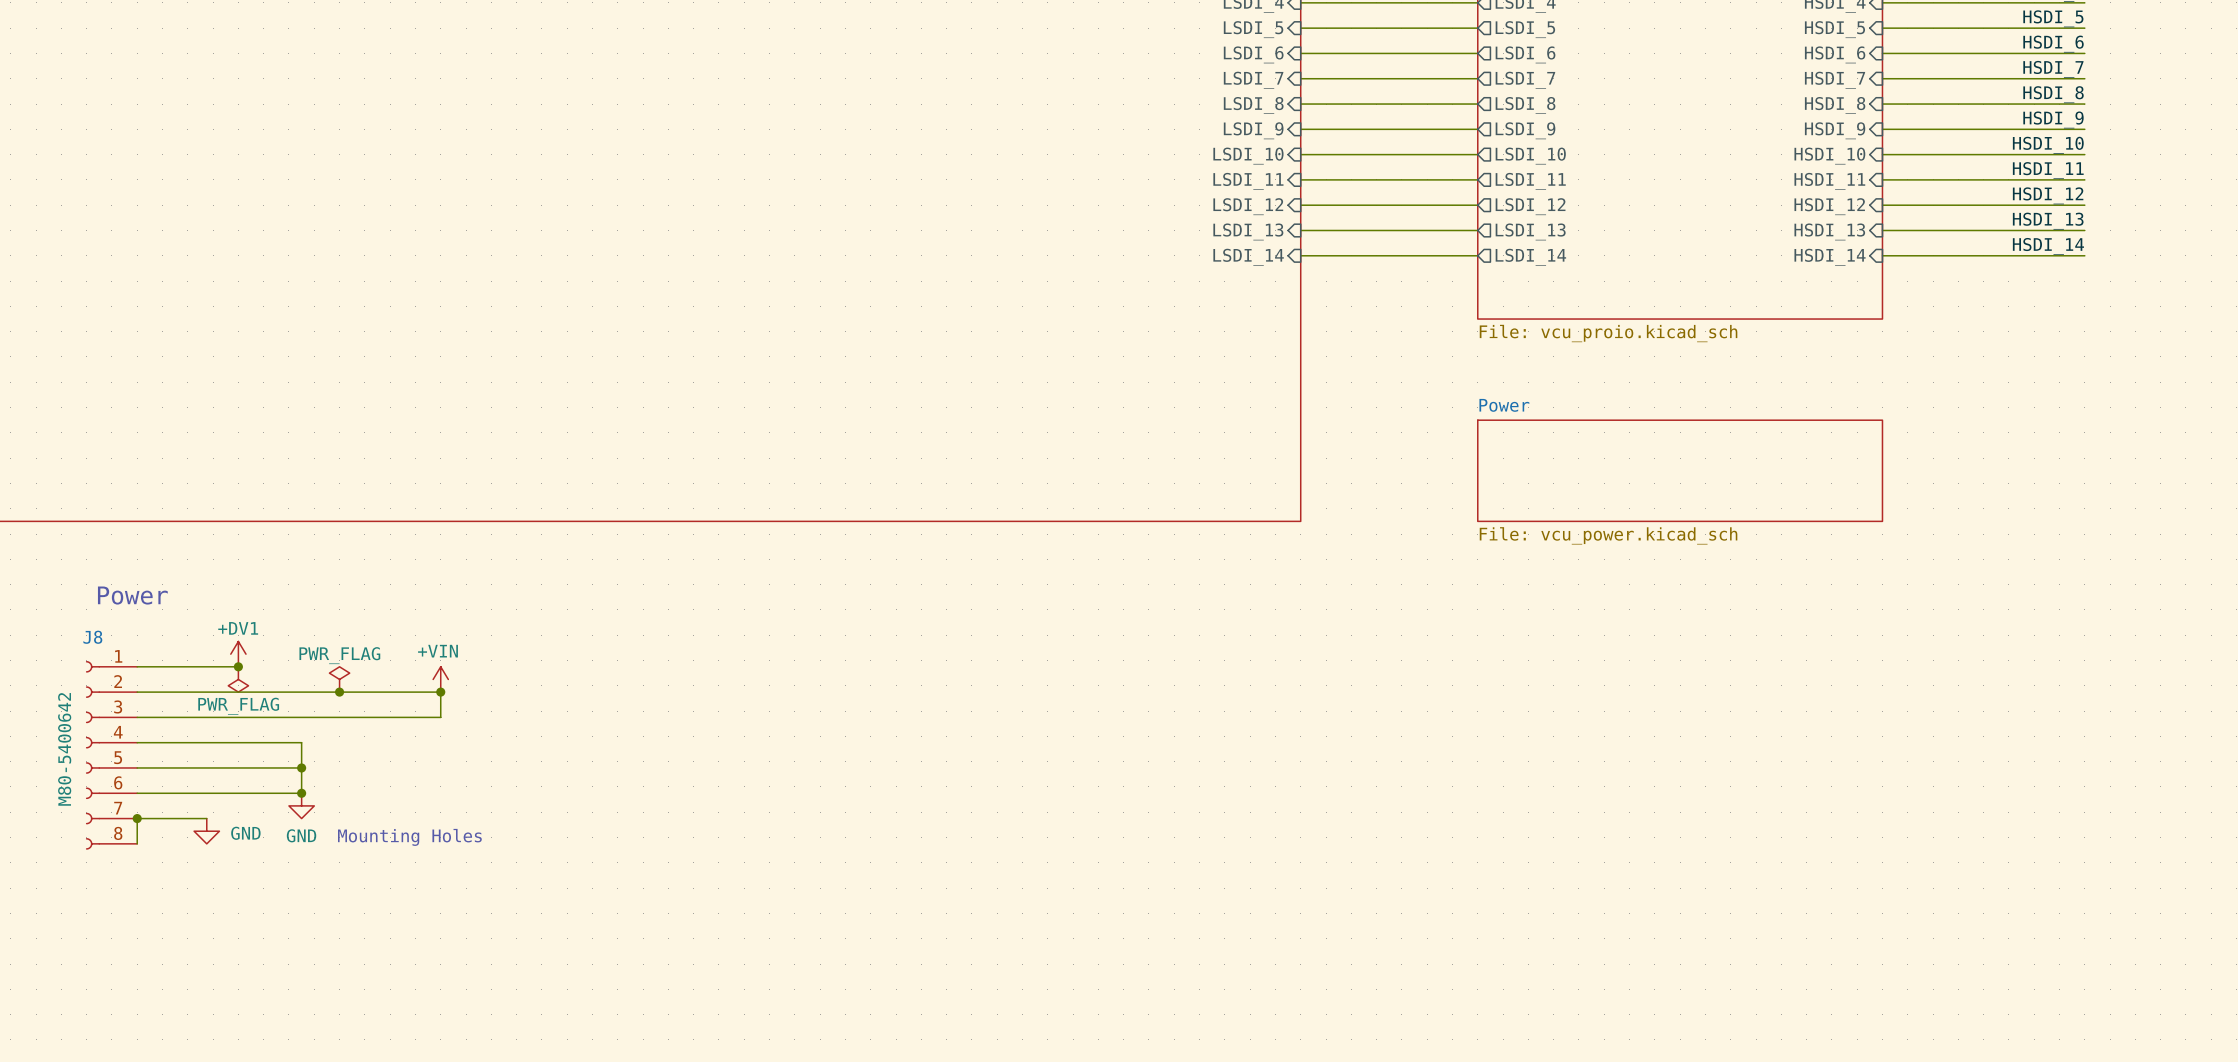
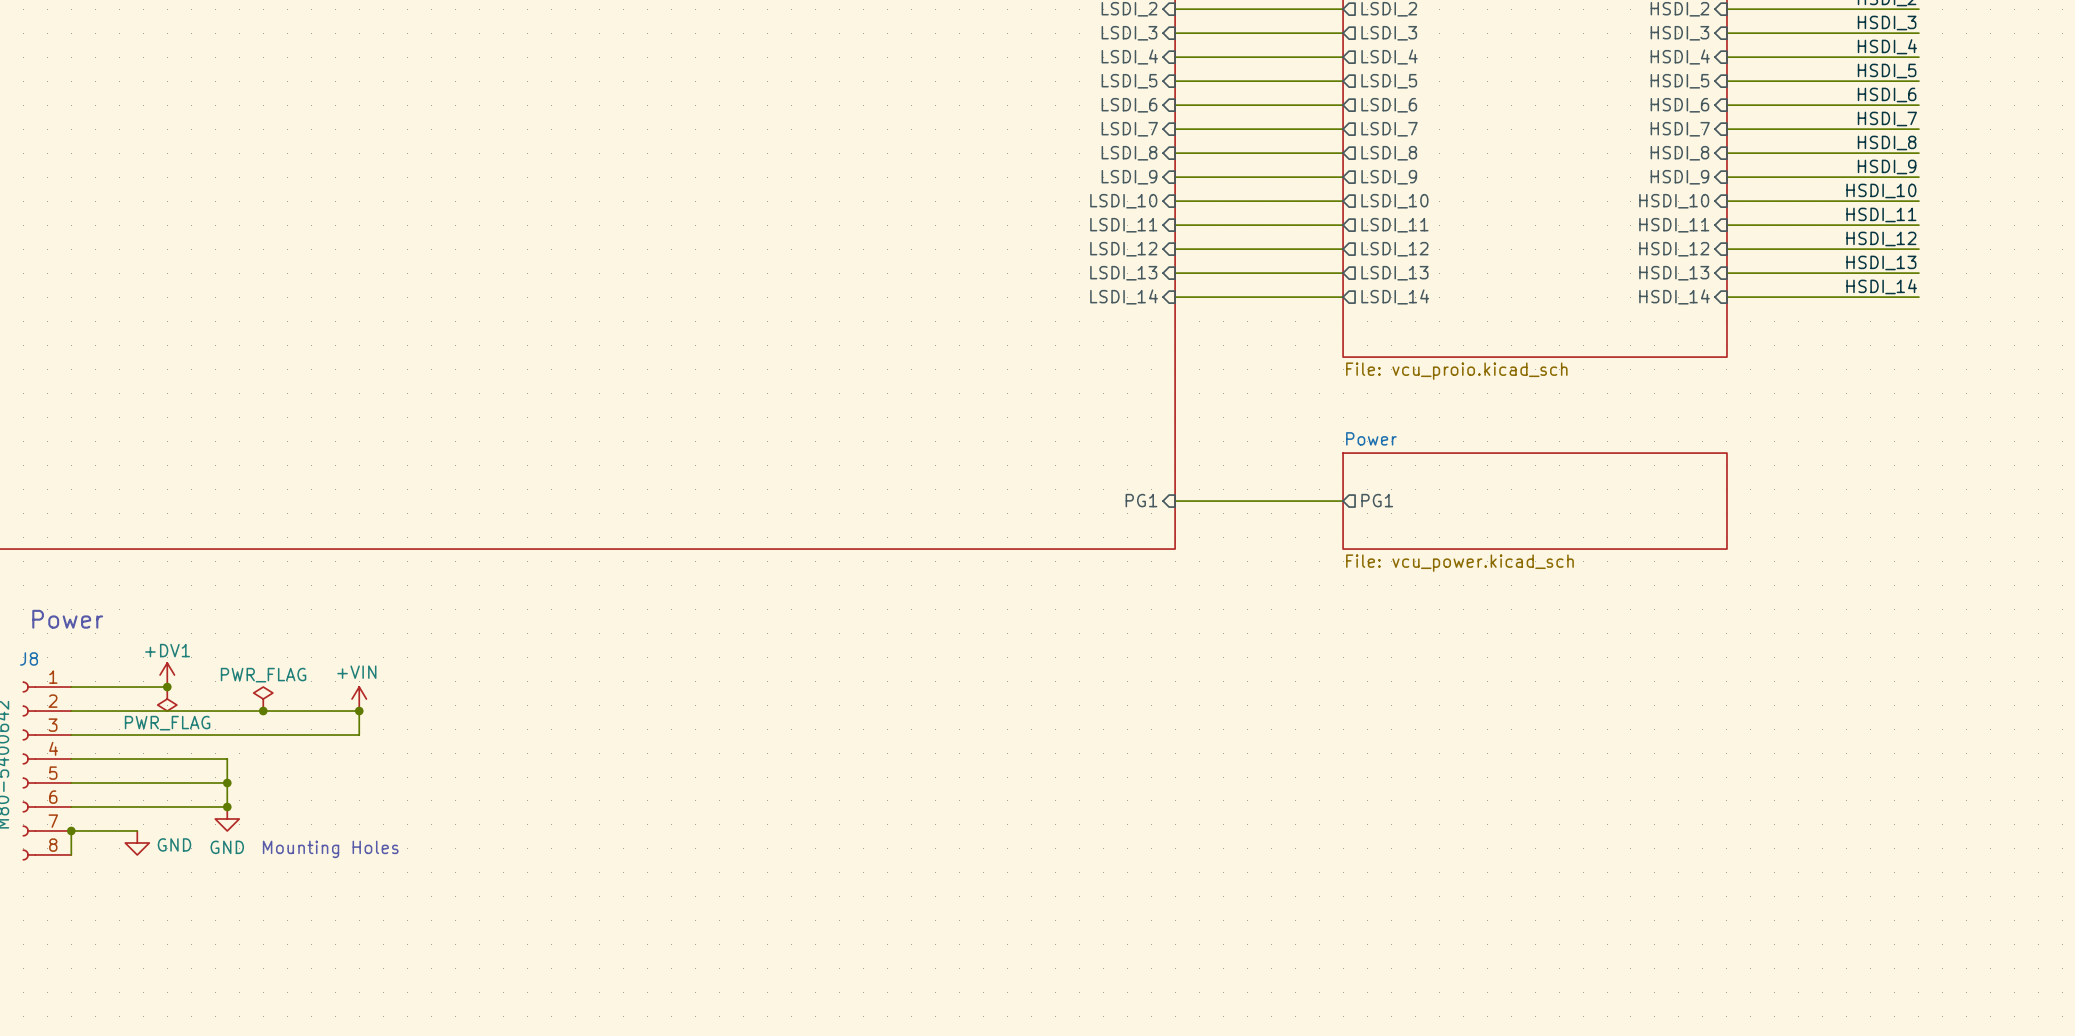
sheet pin: none -> PG1 (1141, 500)
wire: none -> (1175, 501) (1343, 501)
sheet pin: none -> PG1 (1377, 500)

